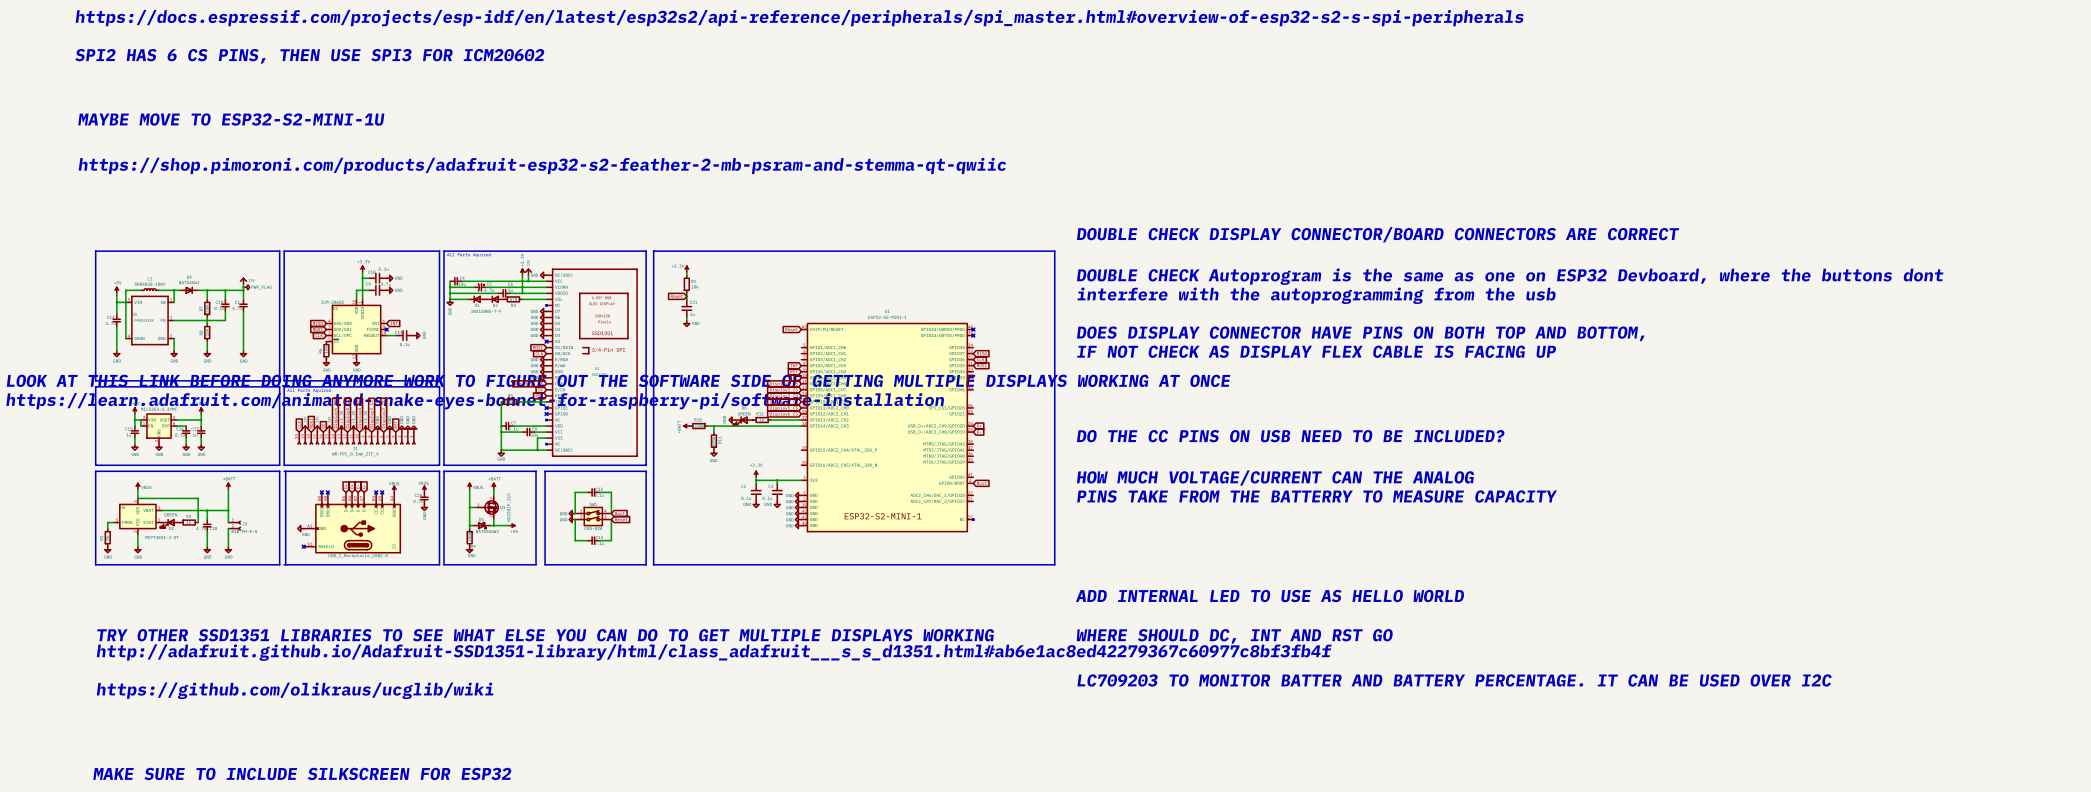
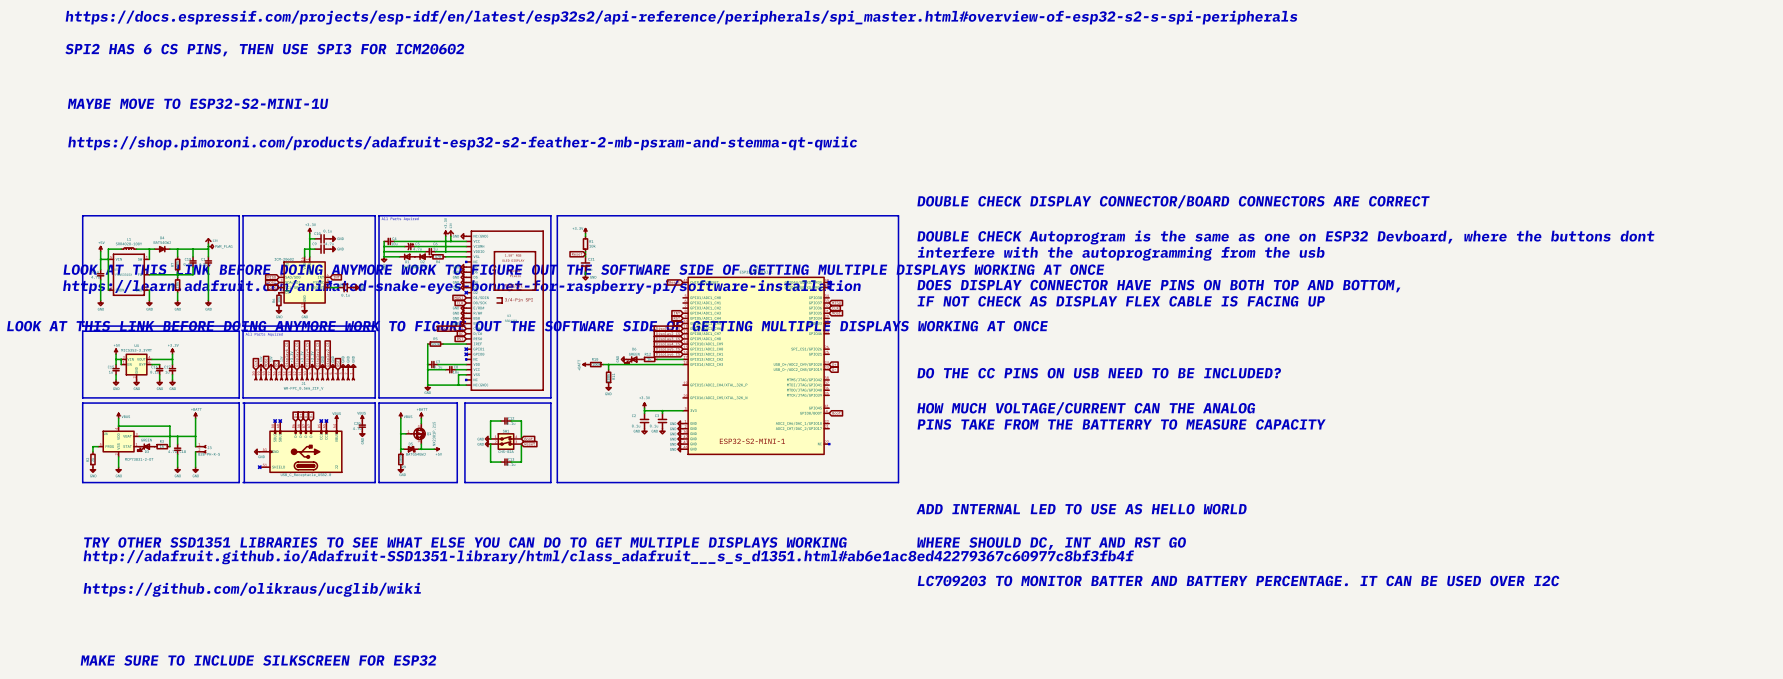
text: none -> LOOK AT THIS LINK BEFORE DOING ANYMORE WORK TO FIGURE OUT THE SOFTWARE SIDE OF GETTING MULTIPLE DISPLAYS WORKING AT ONCE (583, 269)
text: none -> https://learn.adafruit.com/animated-snake-eyes-bonnet-for-raspberry-pi/software-installation (461, 286)
text: https://learn.adafruit.com/animated-snake-eyes-bonnet-for-raspberry-pi/software-installation (475, 401) -> none

